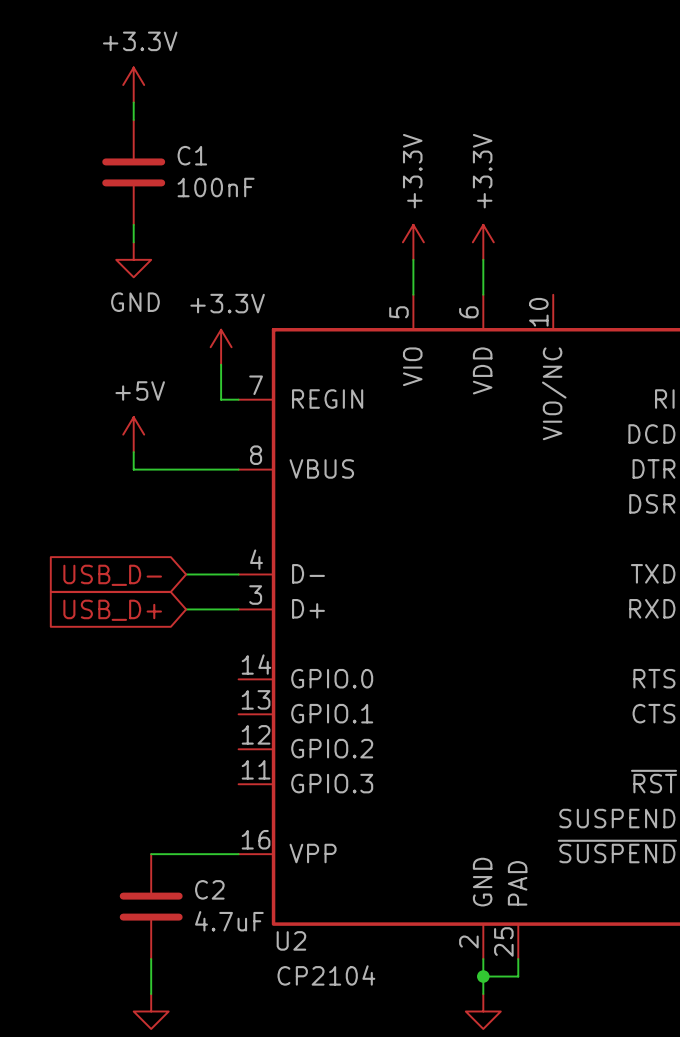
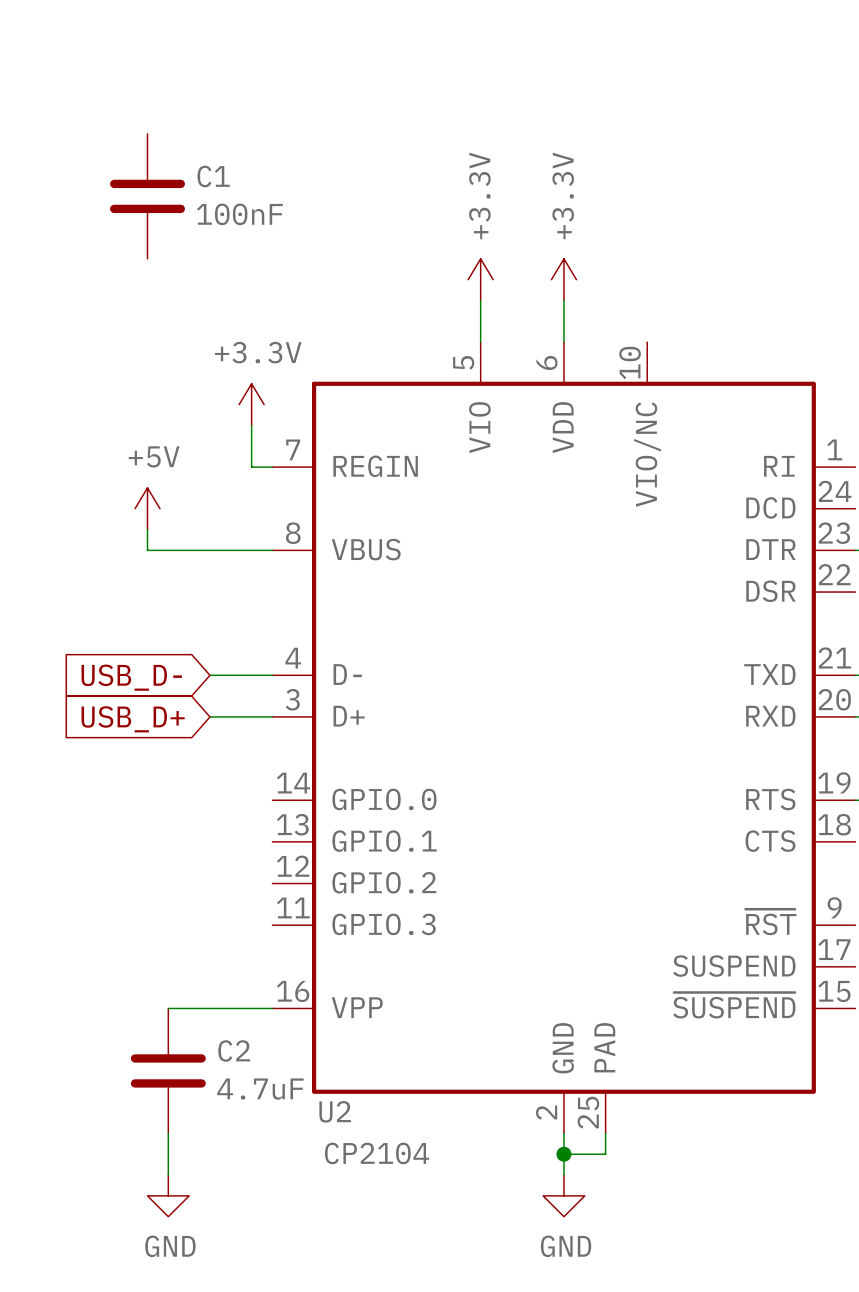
power symbol: +3.3V (133, 85) -> none
wire: (133, 102) (133, 119) -> none
wire: (133, 224) (133, 242) -> none
power symbol: GND (133, 259) -> none

